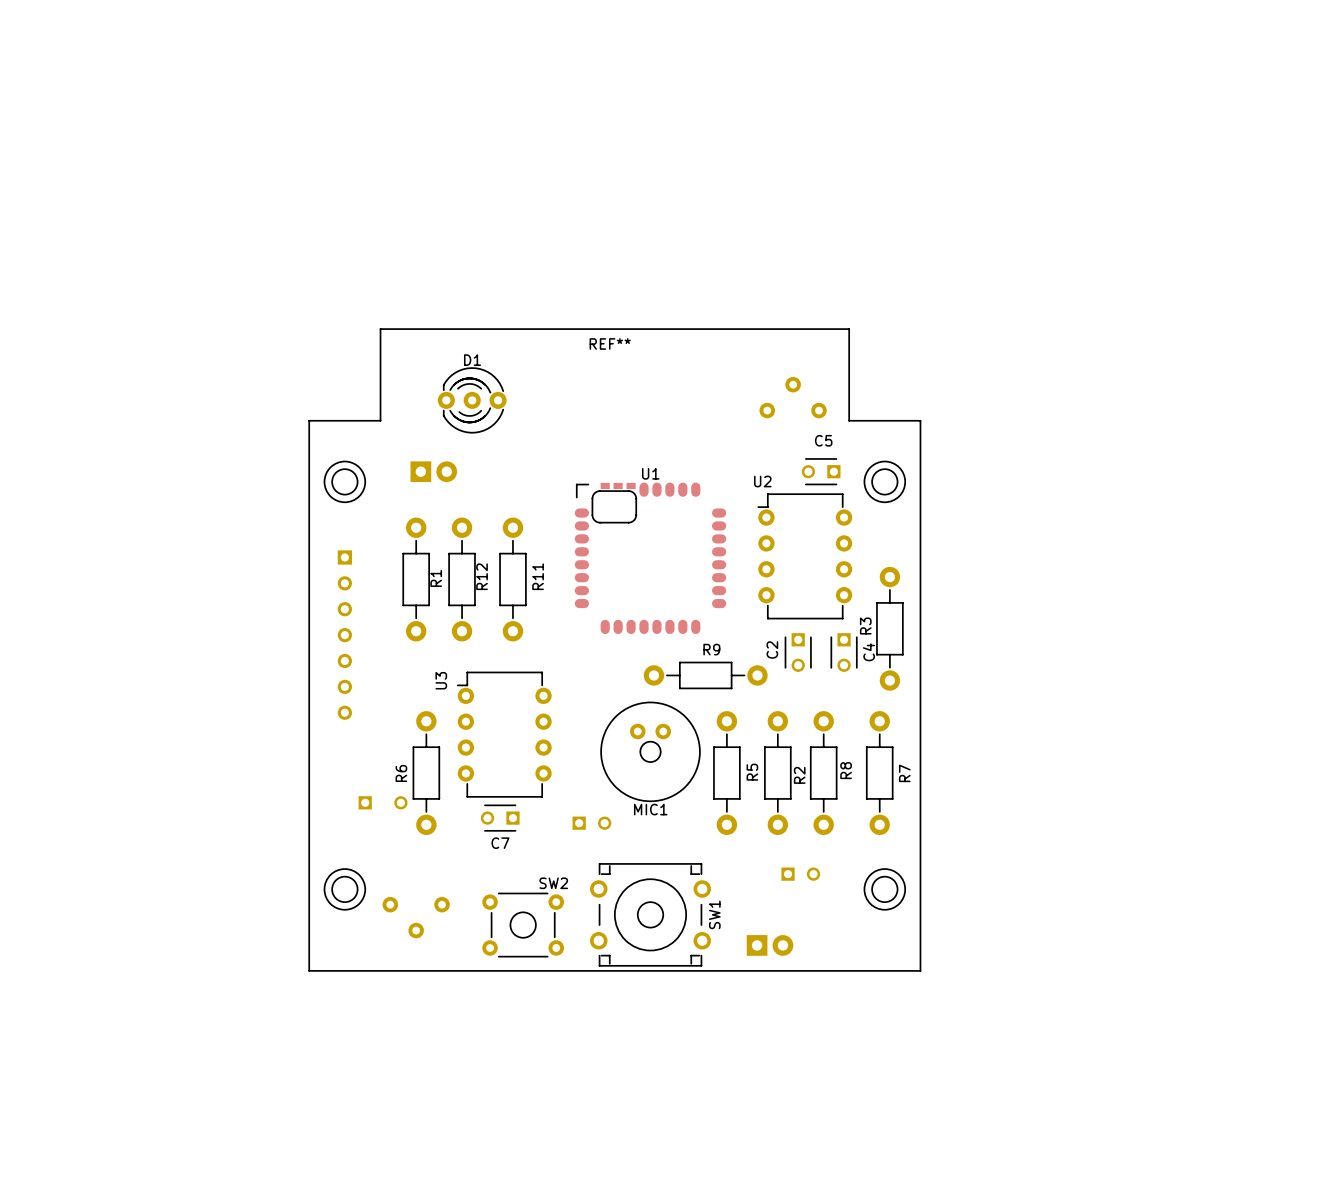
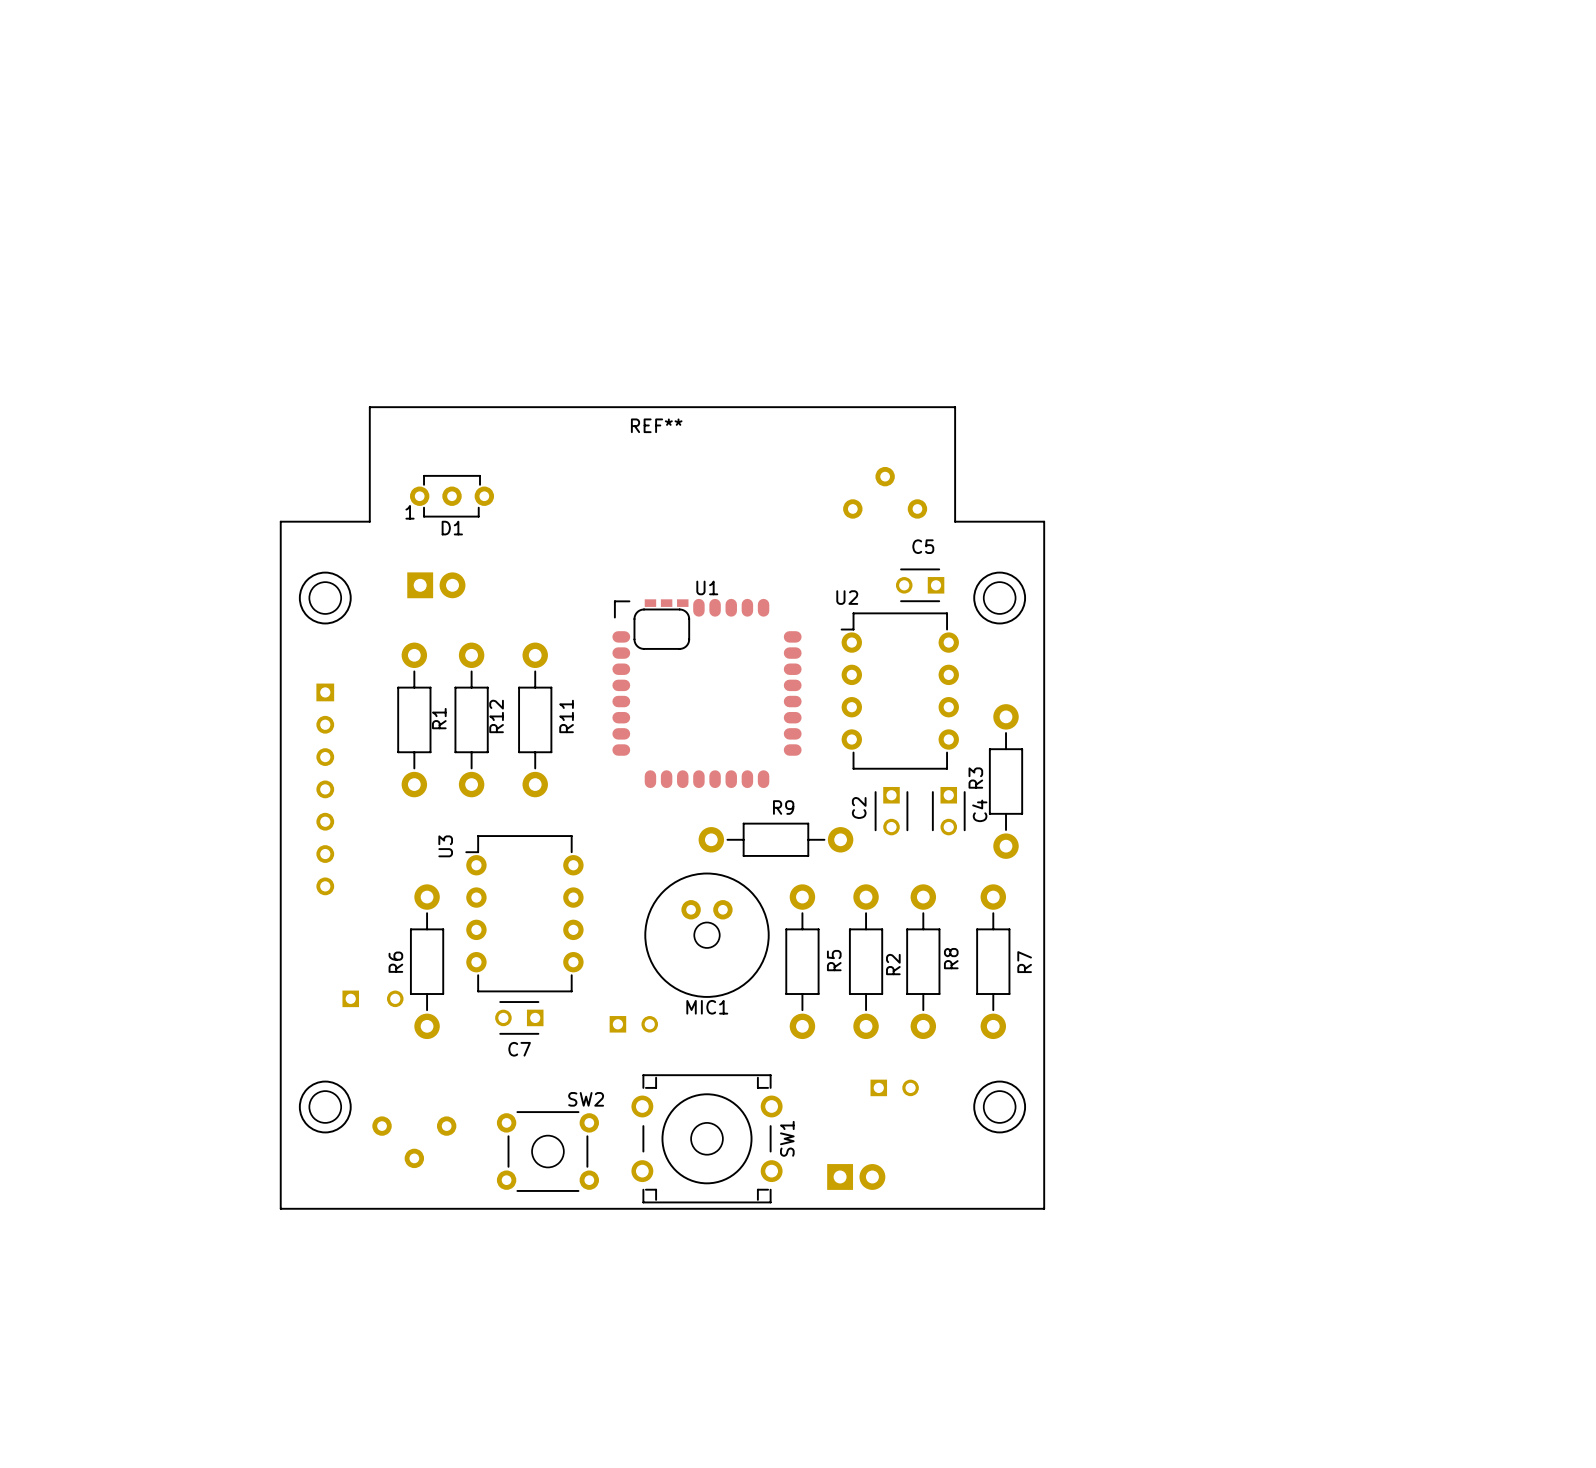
D1 name position: D1 (472, 360) -> D1 (452, 528)
D1 footprint: [437, 367, 507, 434] -> [409, 474, 495, 518]

